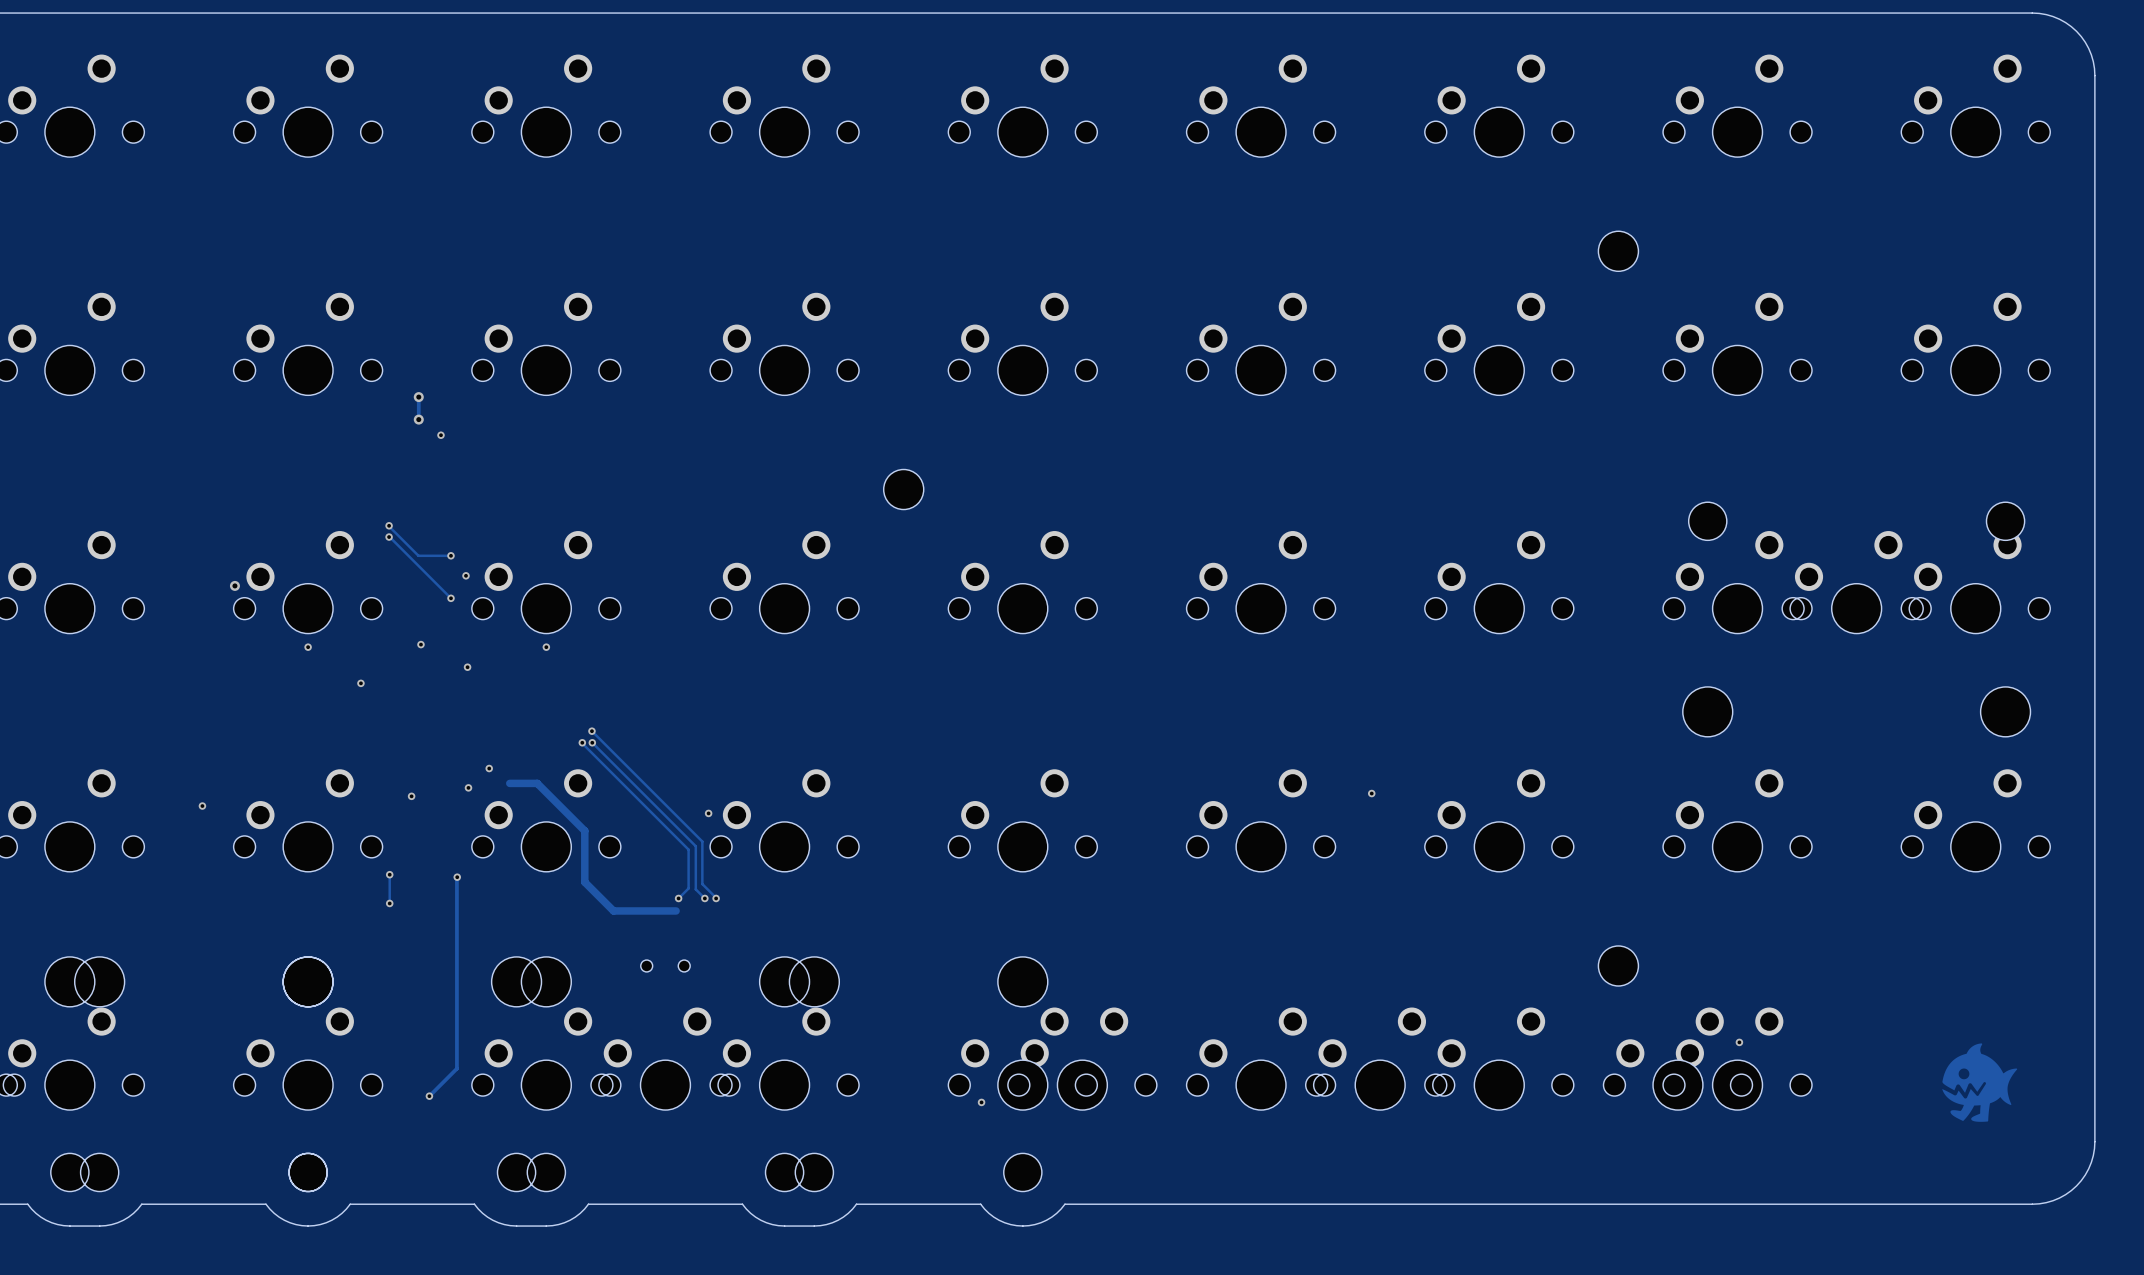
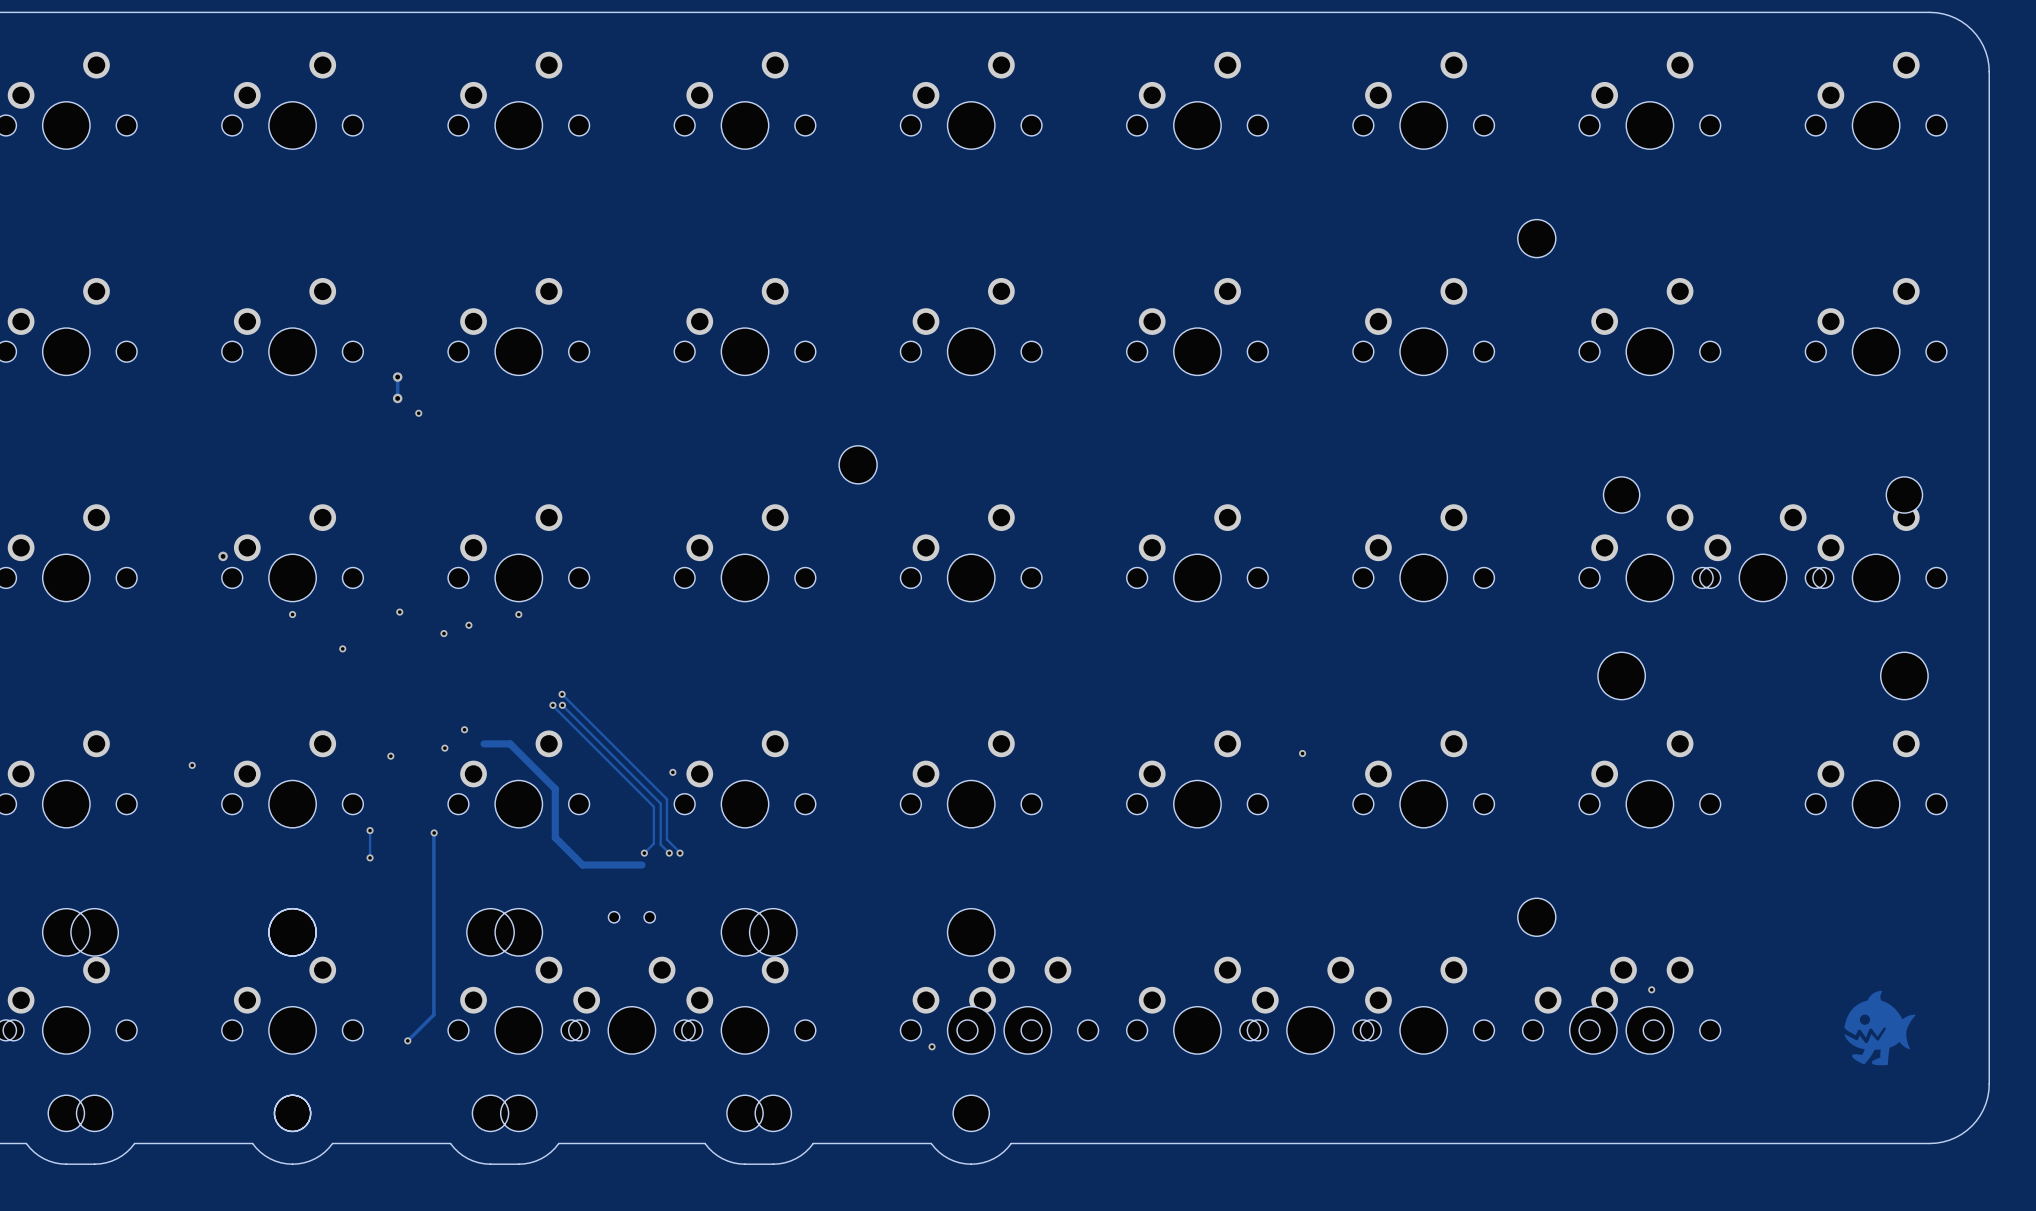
track: (389, 525) (418, 555) (450, 555) -> none
via: (389, 525) -> none
track: (389, 537) (450, 598) -> none
via: (389, 537) -> none
via: (450, 555) -> none
via: (465, 575) -> none
via: (450, 598) -> none
via: none -> (468, 625)

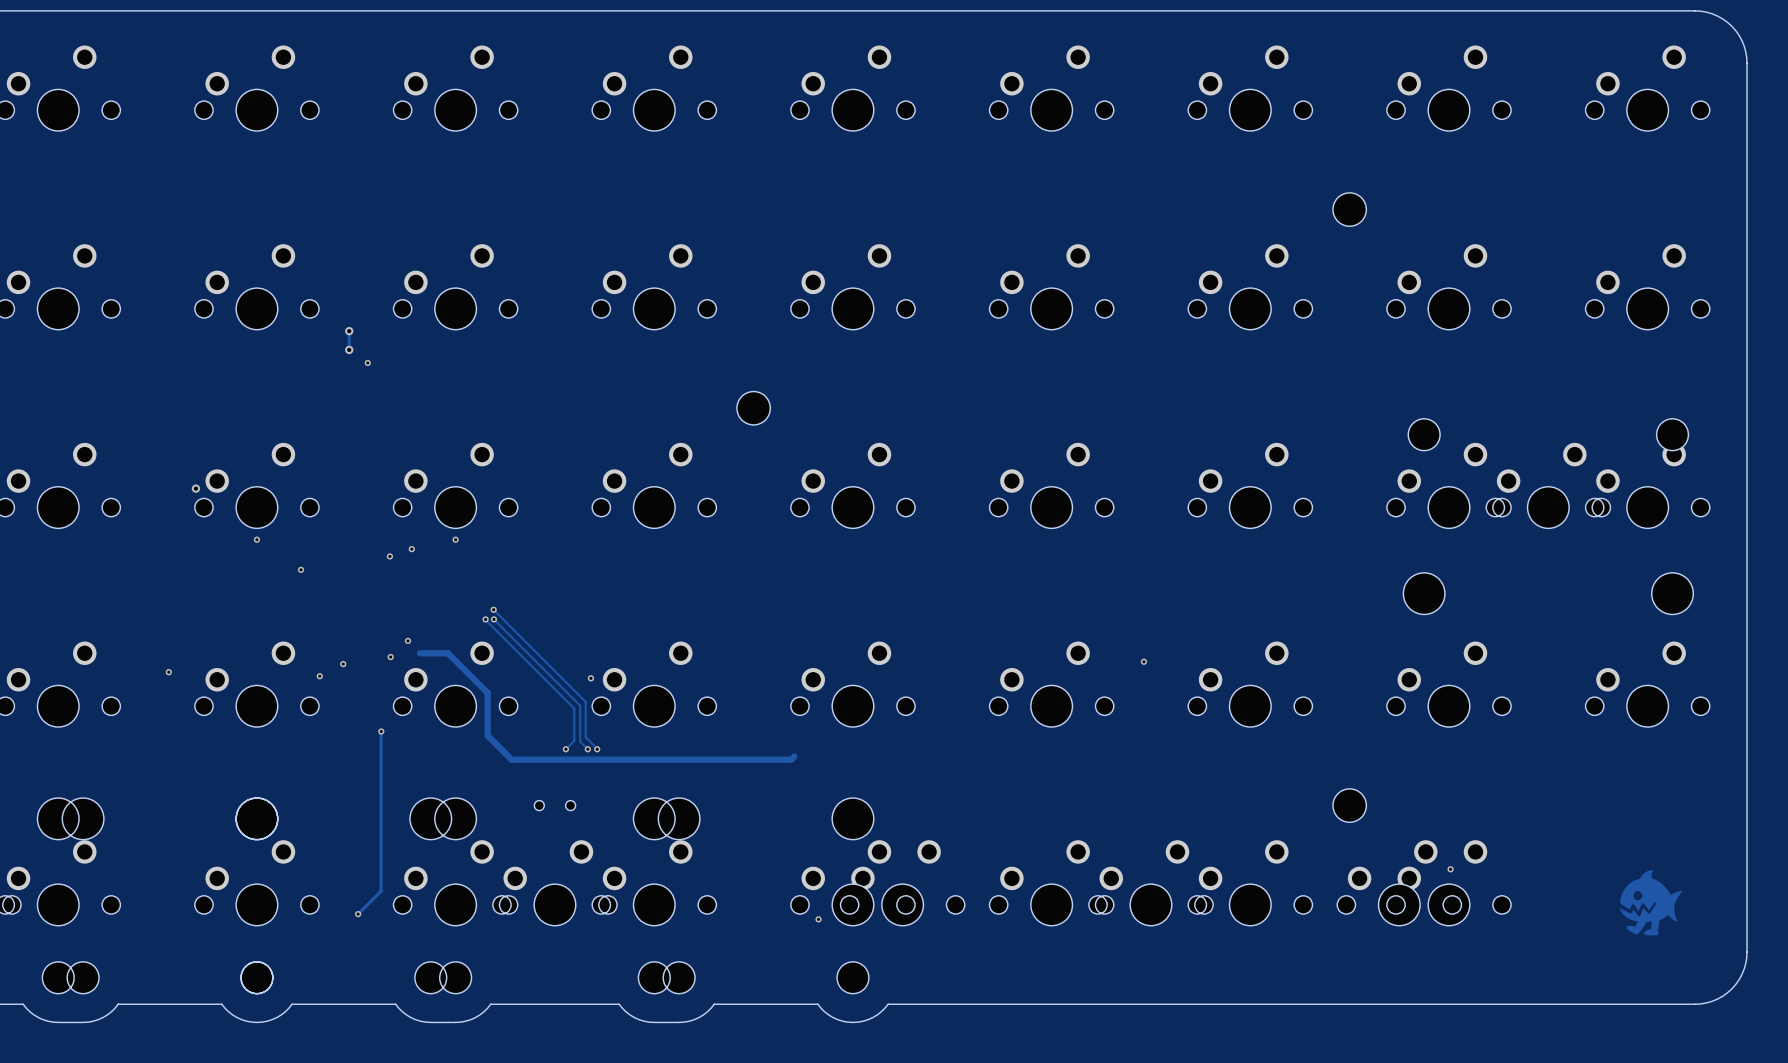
via: (399, 612) -> none
track: none -> (419, 653) (425, 653)
via: none -> (319, 676)
track: (370, 830) (370, 857) -> none
via: (370, 830) -> none
via: (370, 857) -> none
track: none -> (794, 756) (791, 759) (563, 759)

